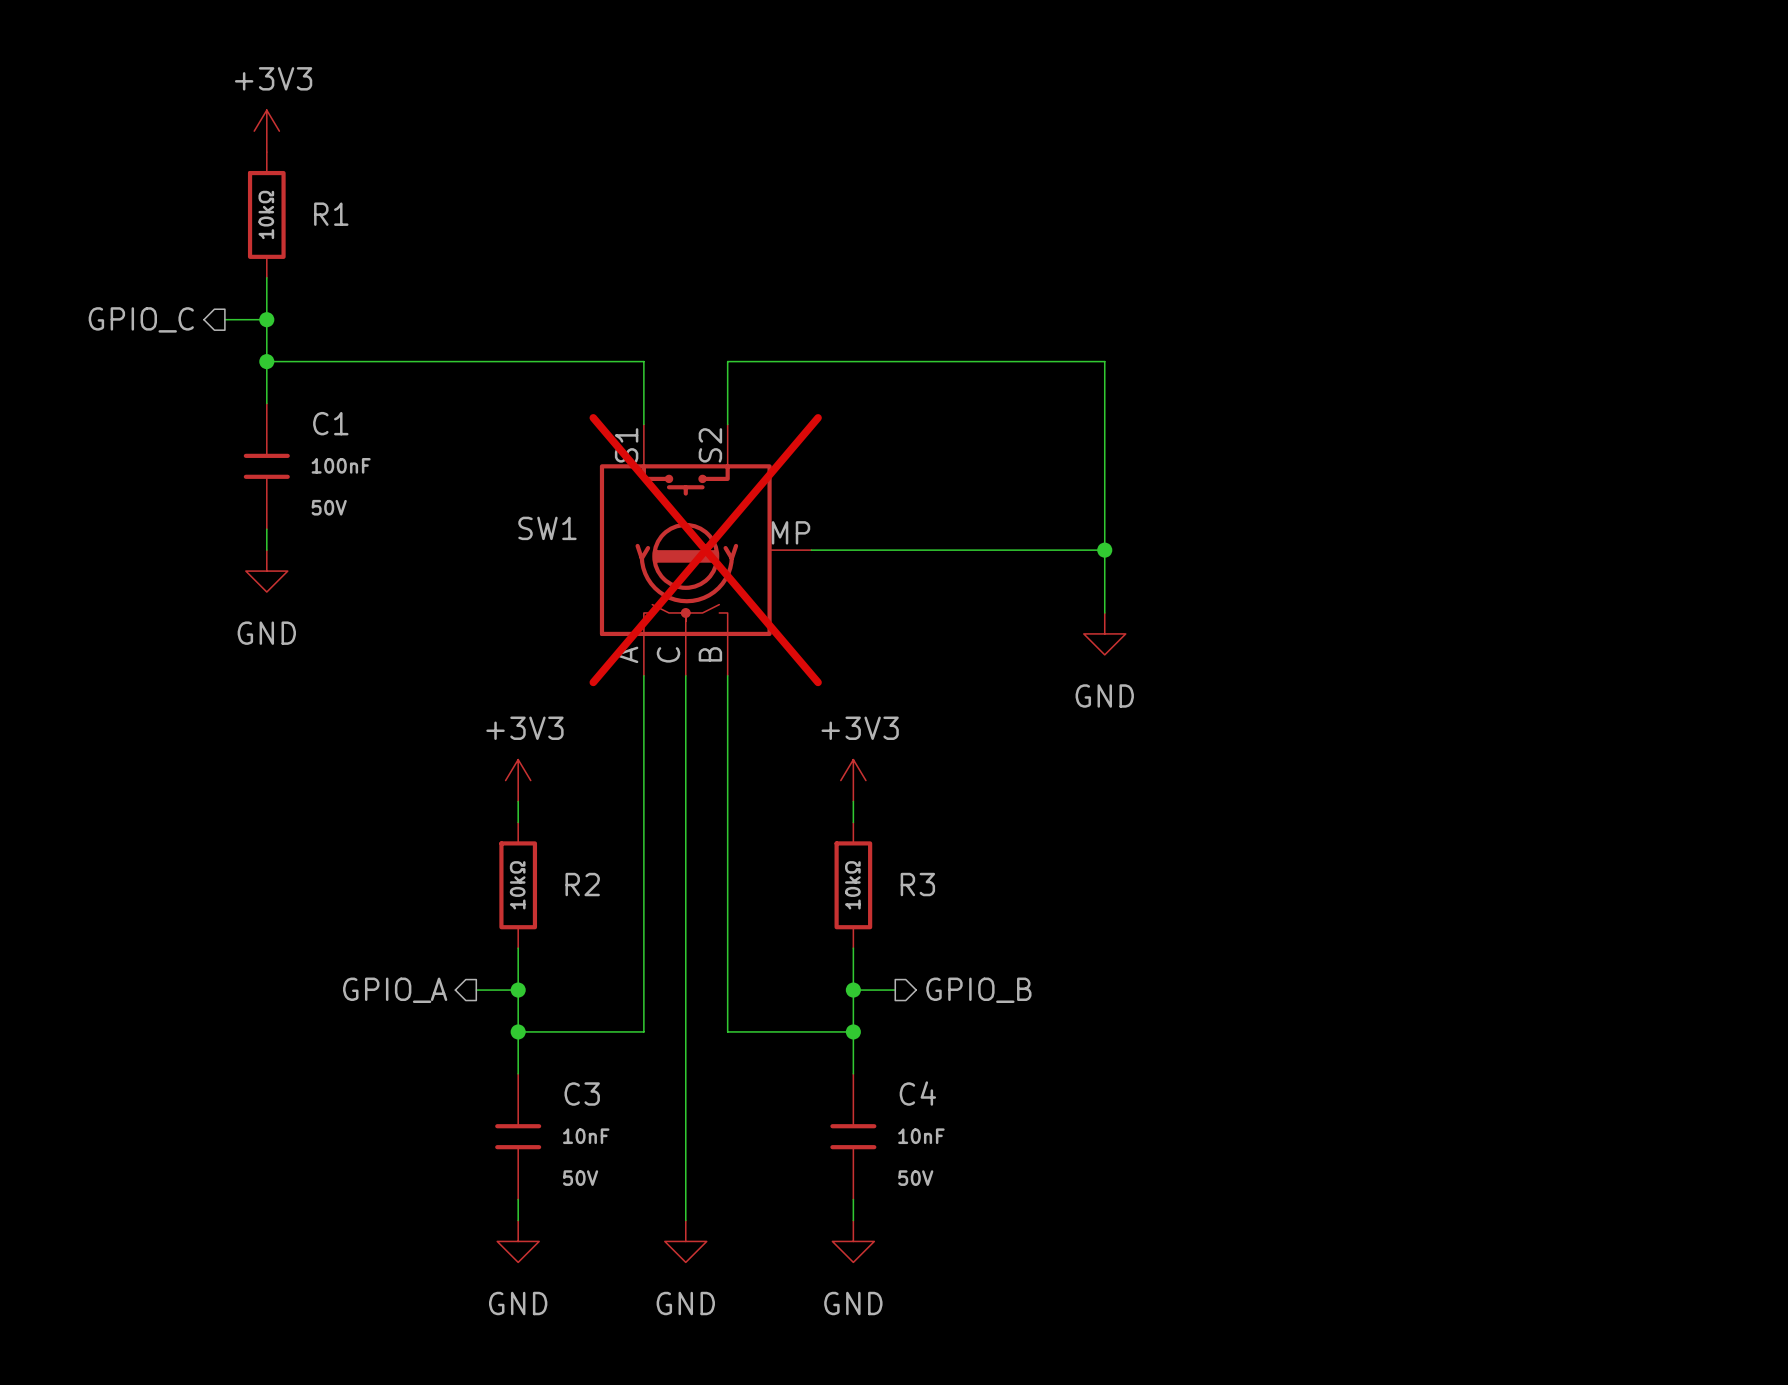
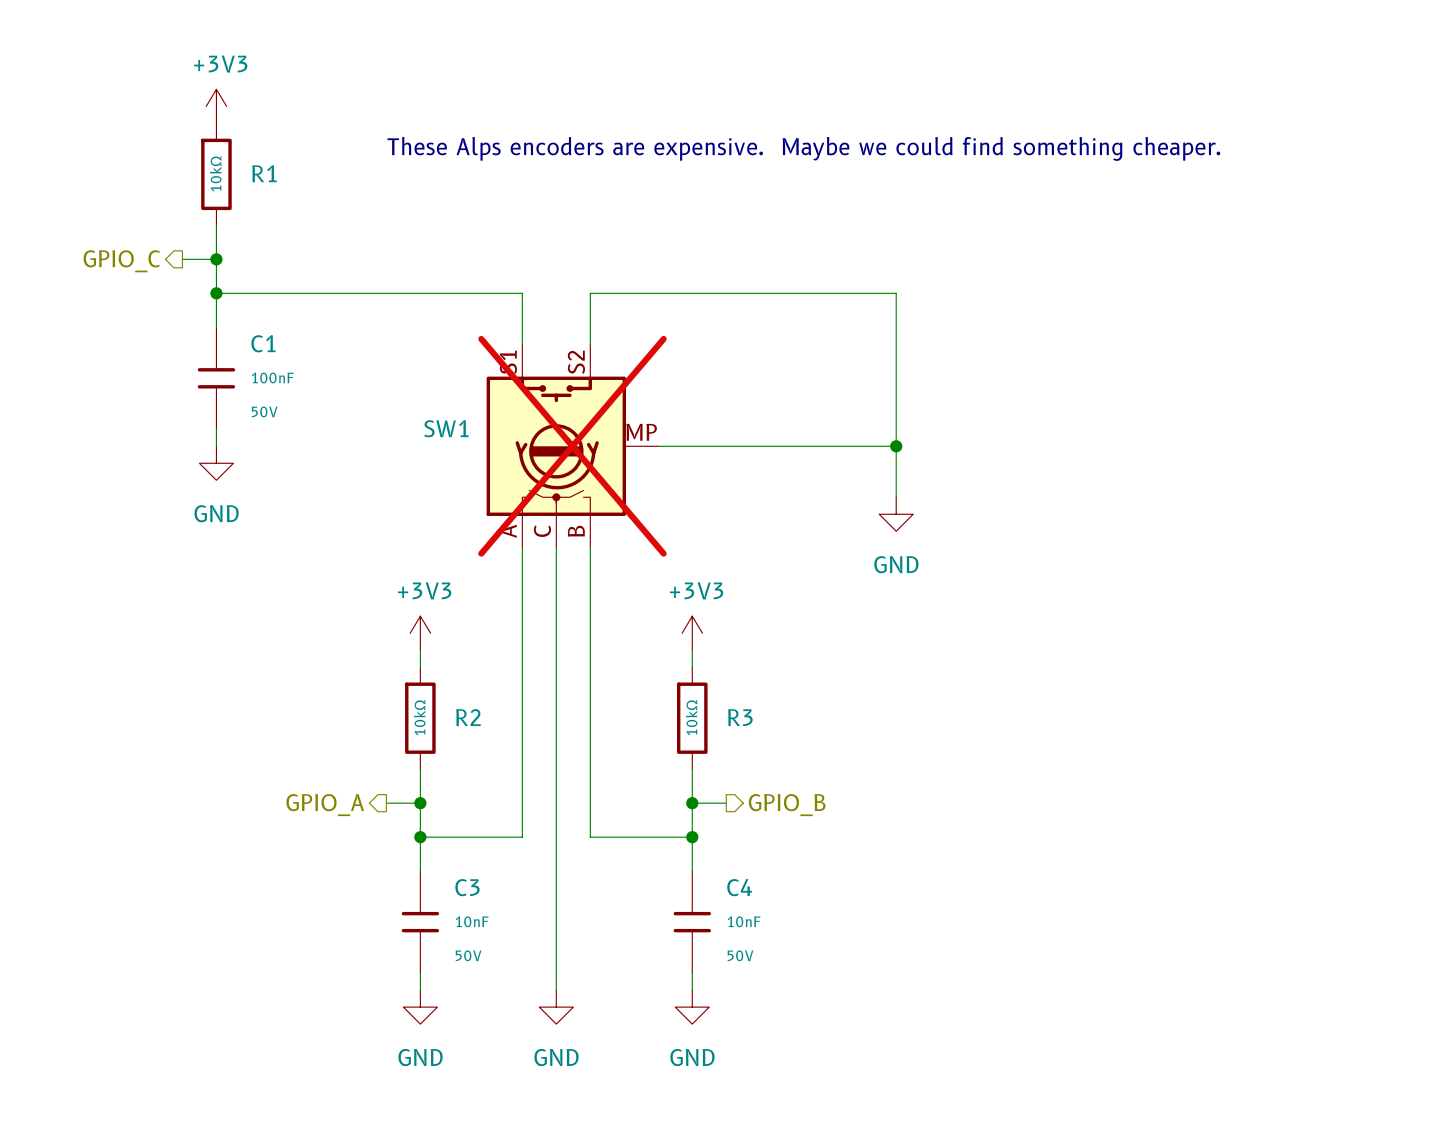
text: none -> These Alps encoders are expensive. Maybe we could find something cheaper. (803, 148)

